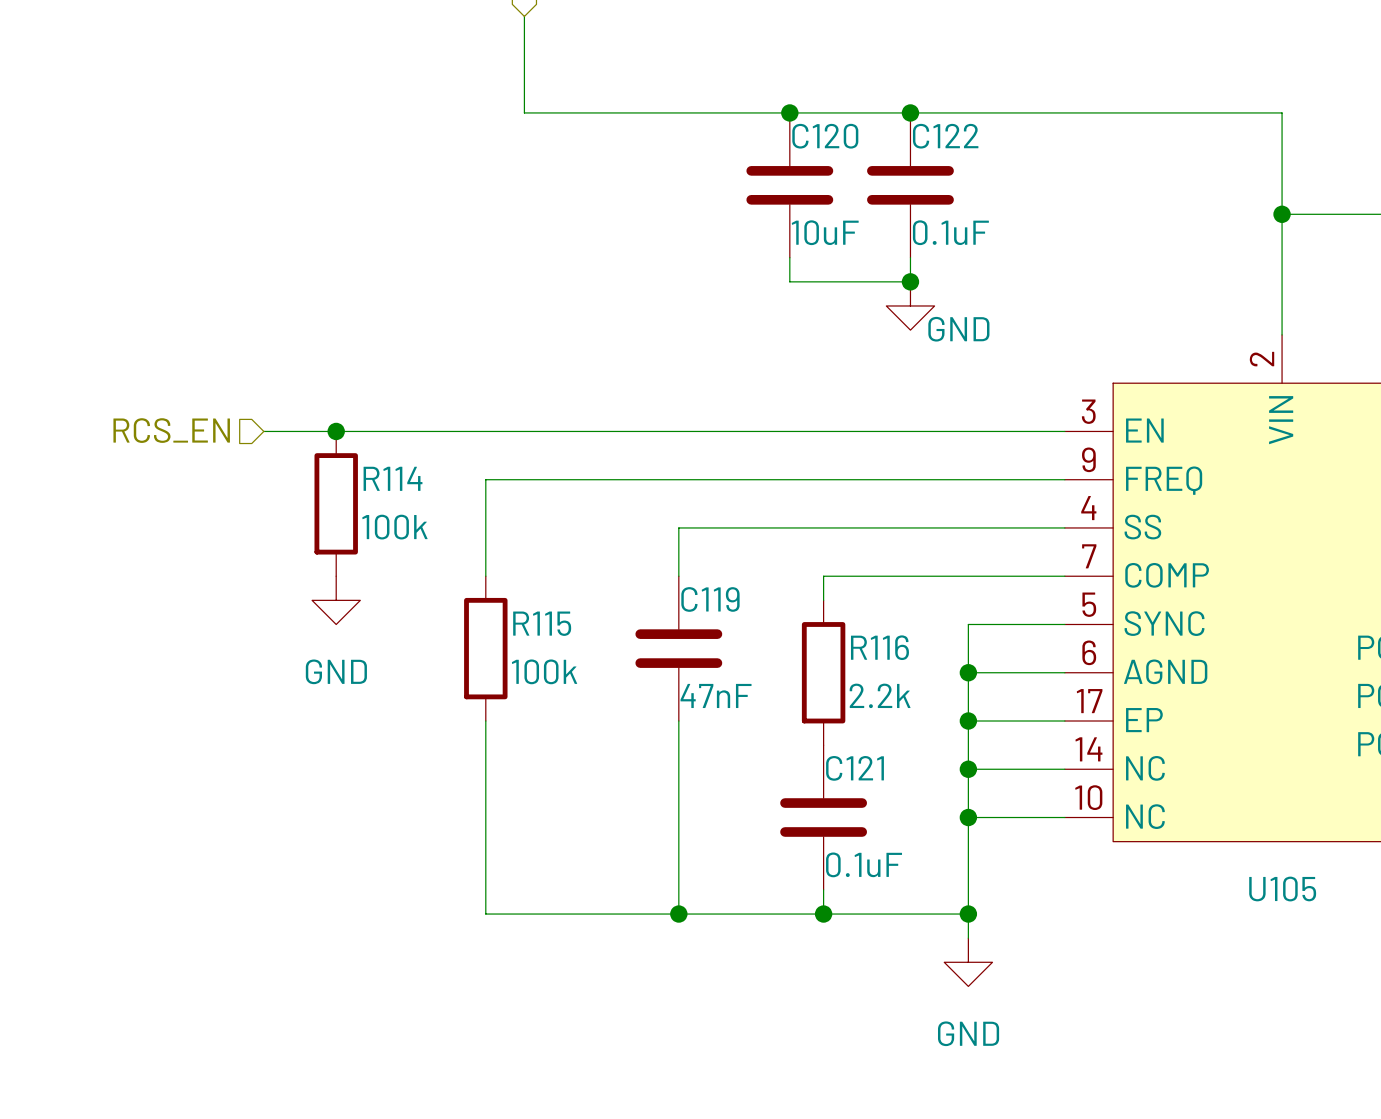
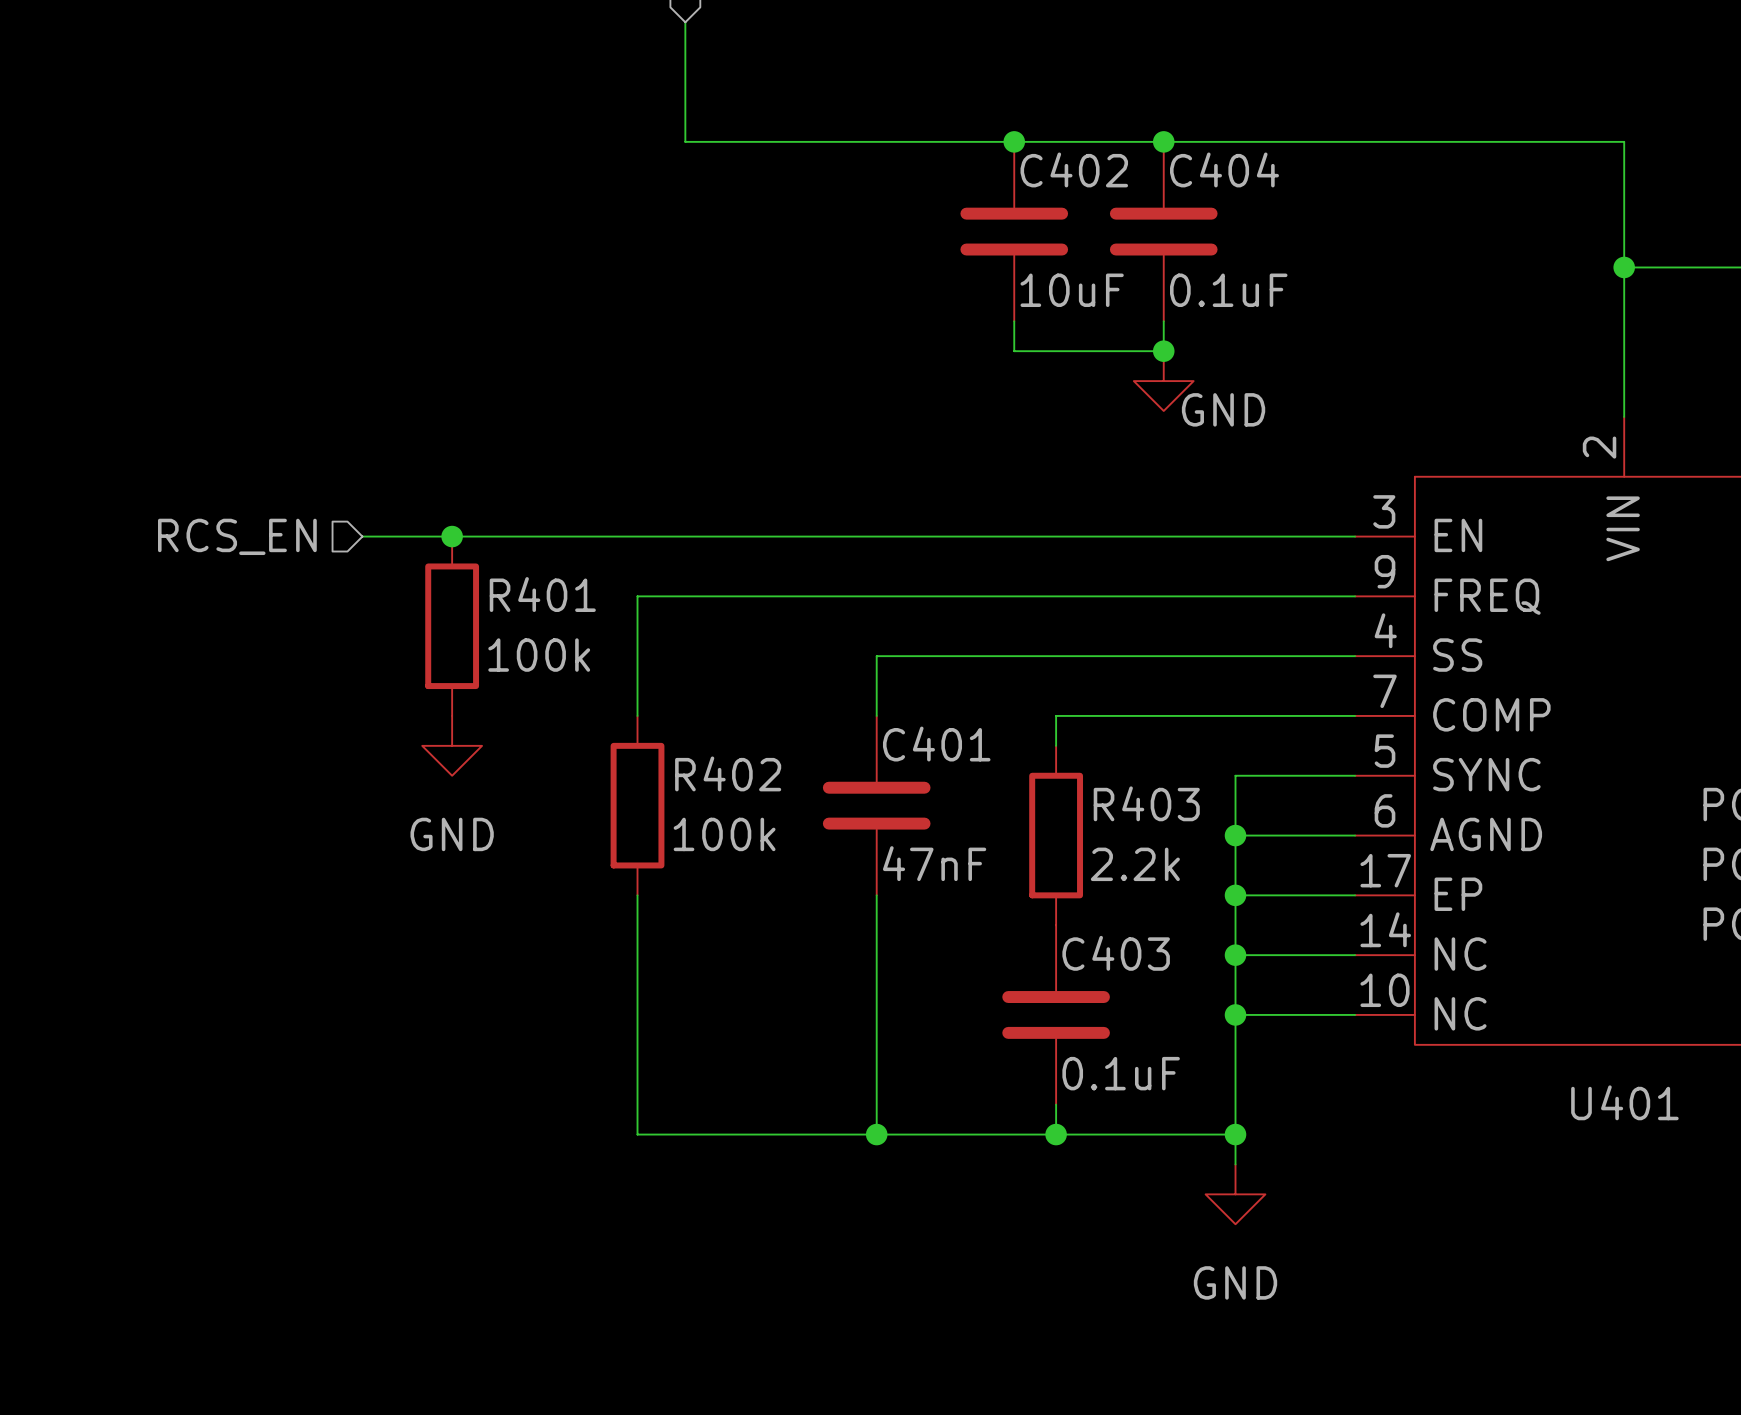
C120 name: C120 (825, 136) -> C402 (1074, 169)
C122 name: C122 (945, 136) -> C404 (1224, 169)
R114 name: R114 (393, 478) -> R401 (542, 594)
C119 name: C119 (710, 599) -> C401 (936, 744)
R115 name: R115 (542, 623) -> R402 (728, 773)
R116 name: R116 (879, 647) -> R403 (1146, 803)
C121 name: C121 (855, 768) -> C403 (1116, 953)
U105 name: U105 (1282, 889) -> U401 (1624, 1102)

